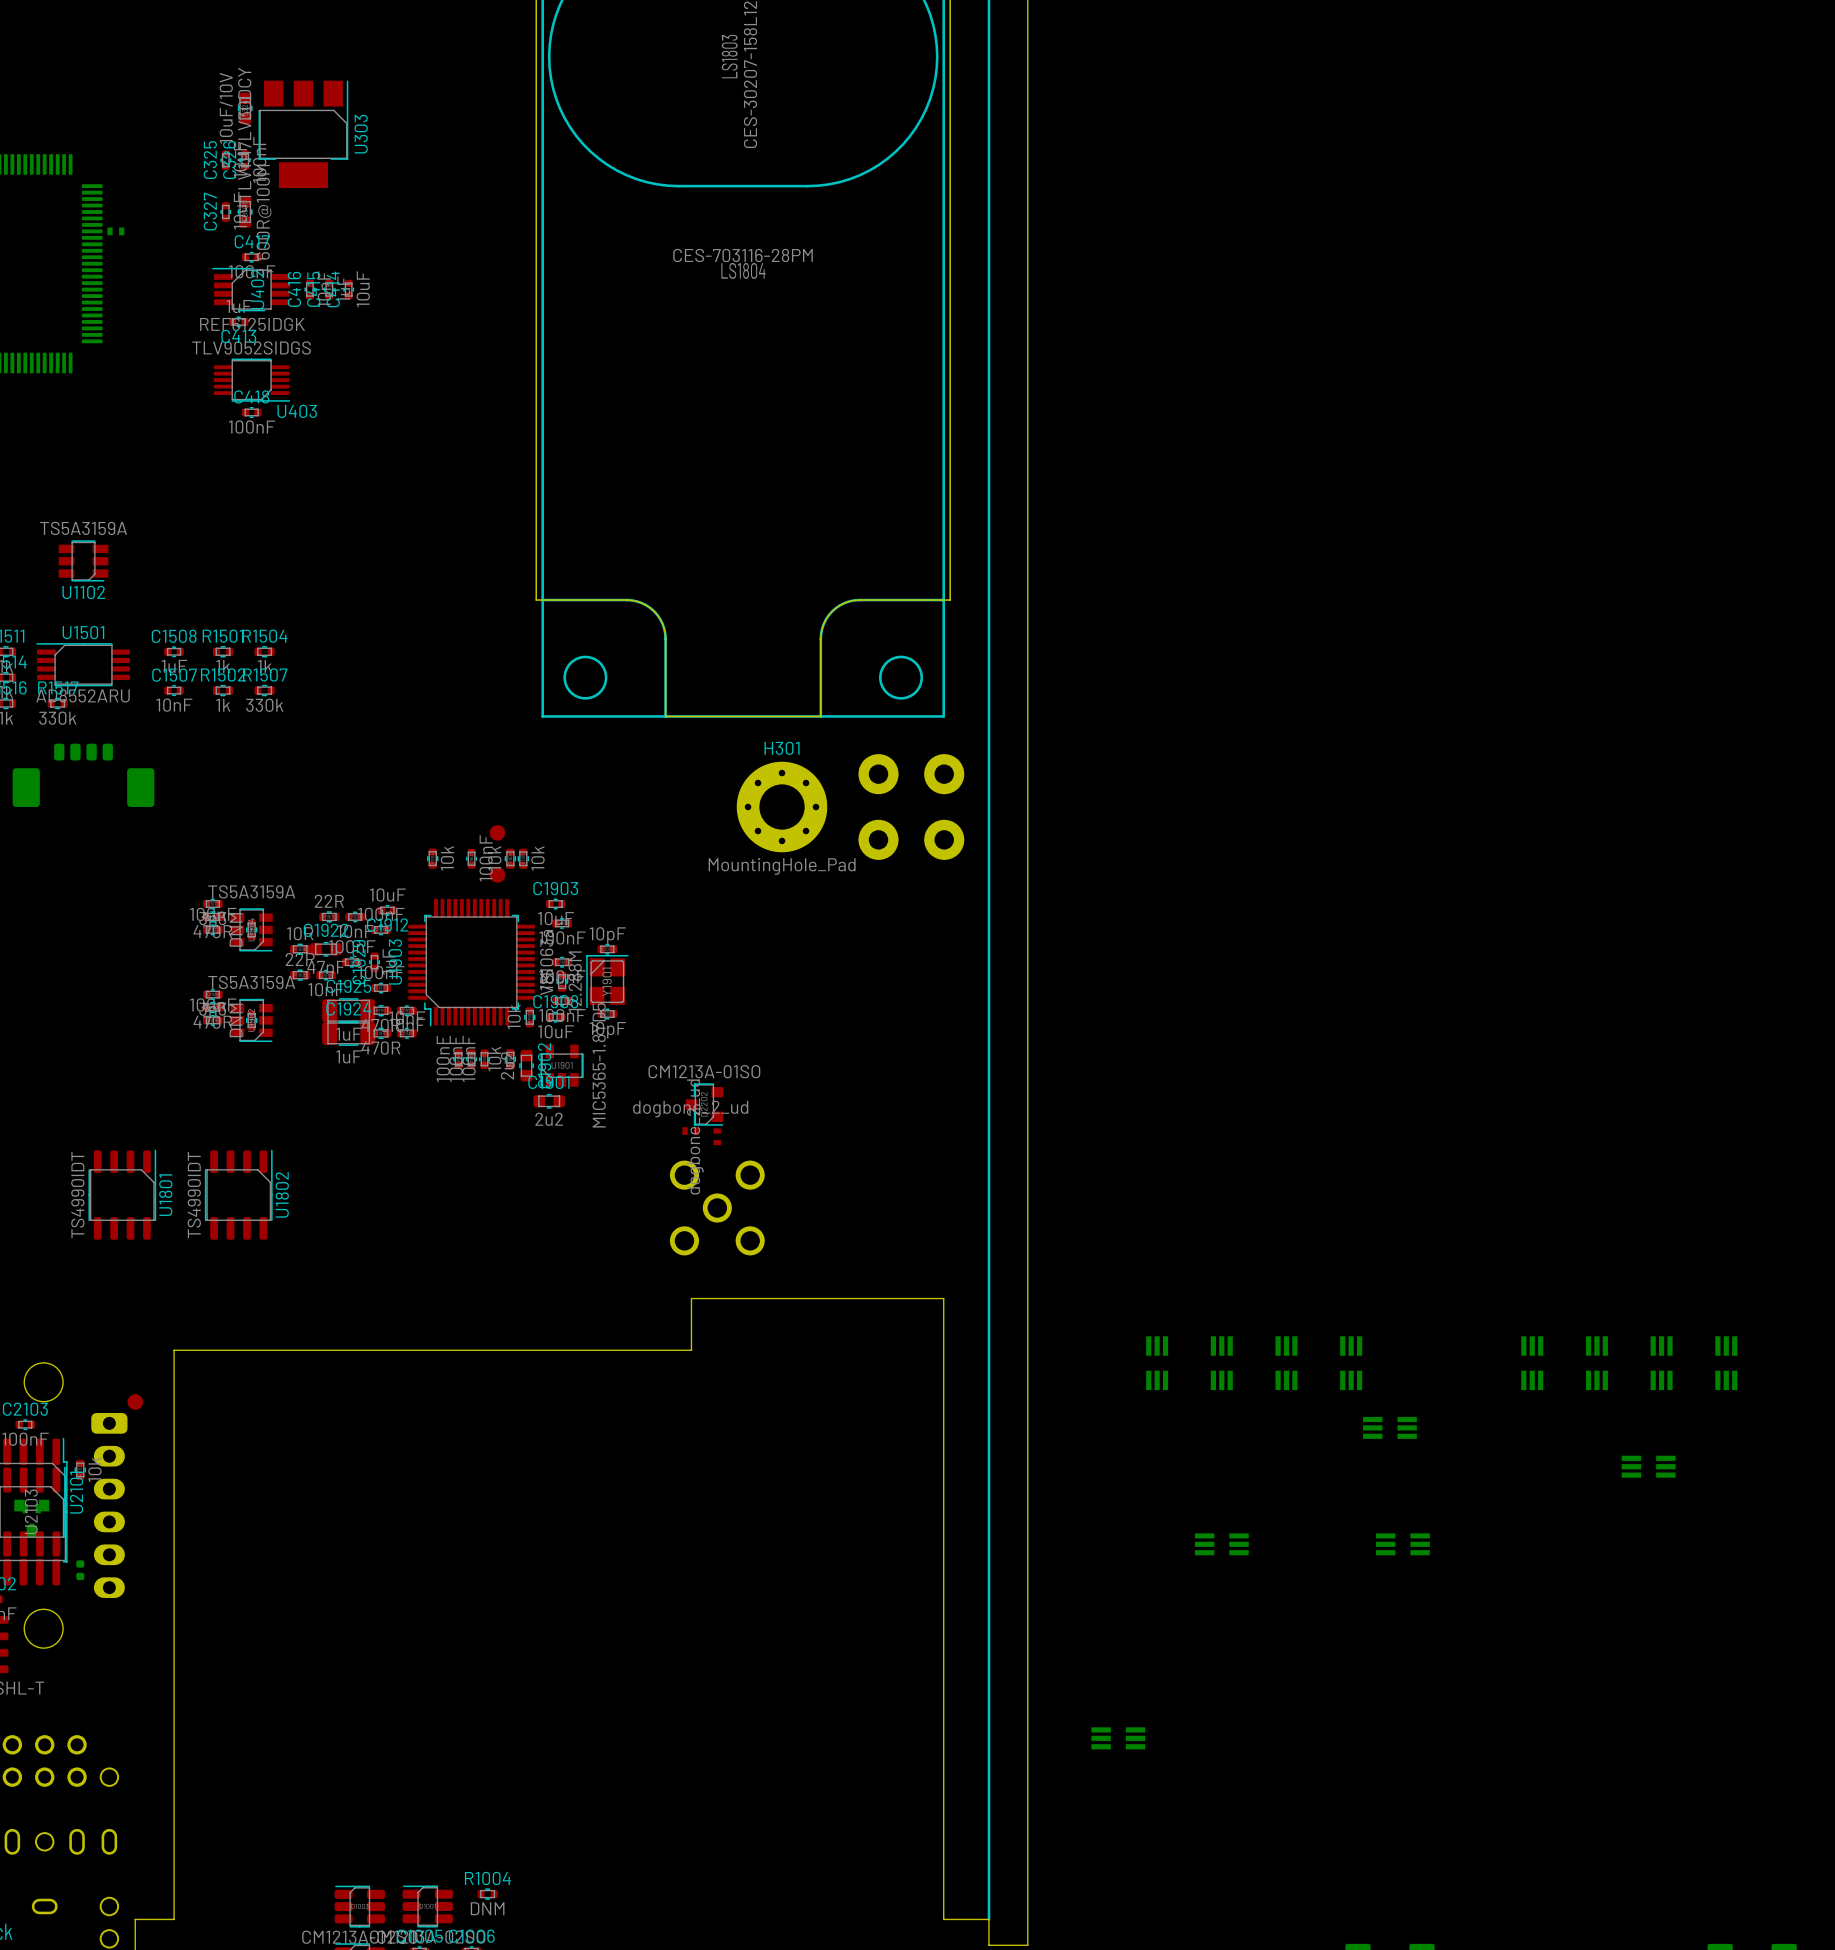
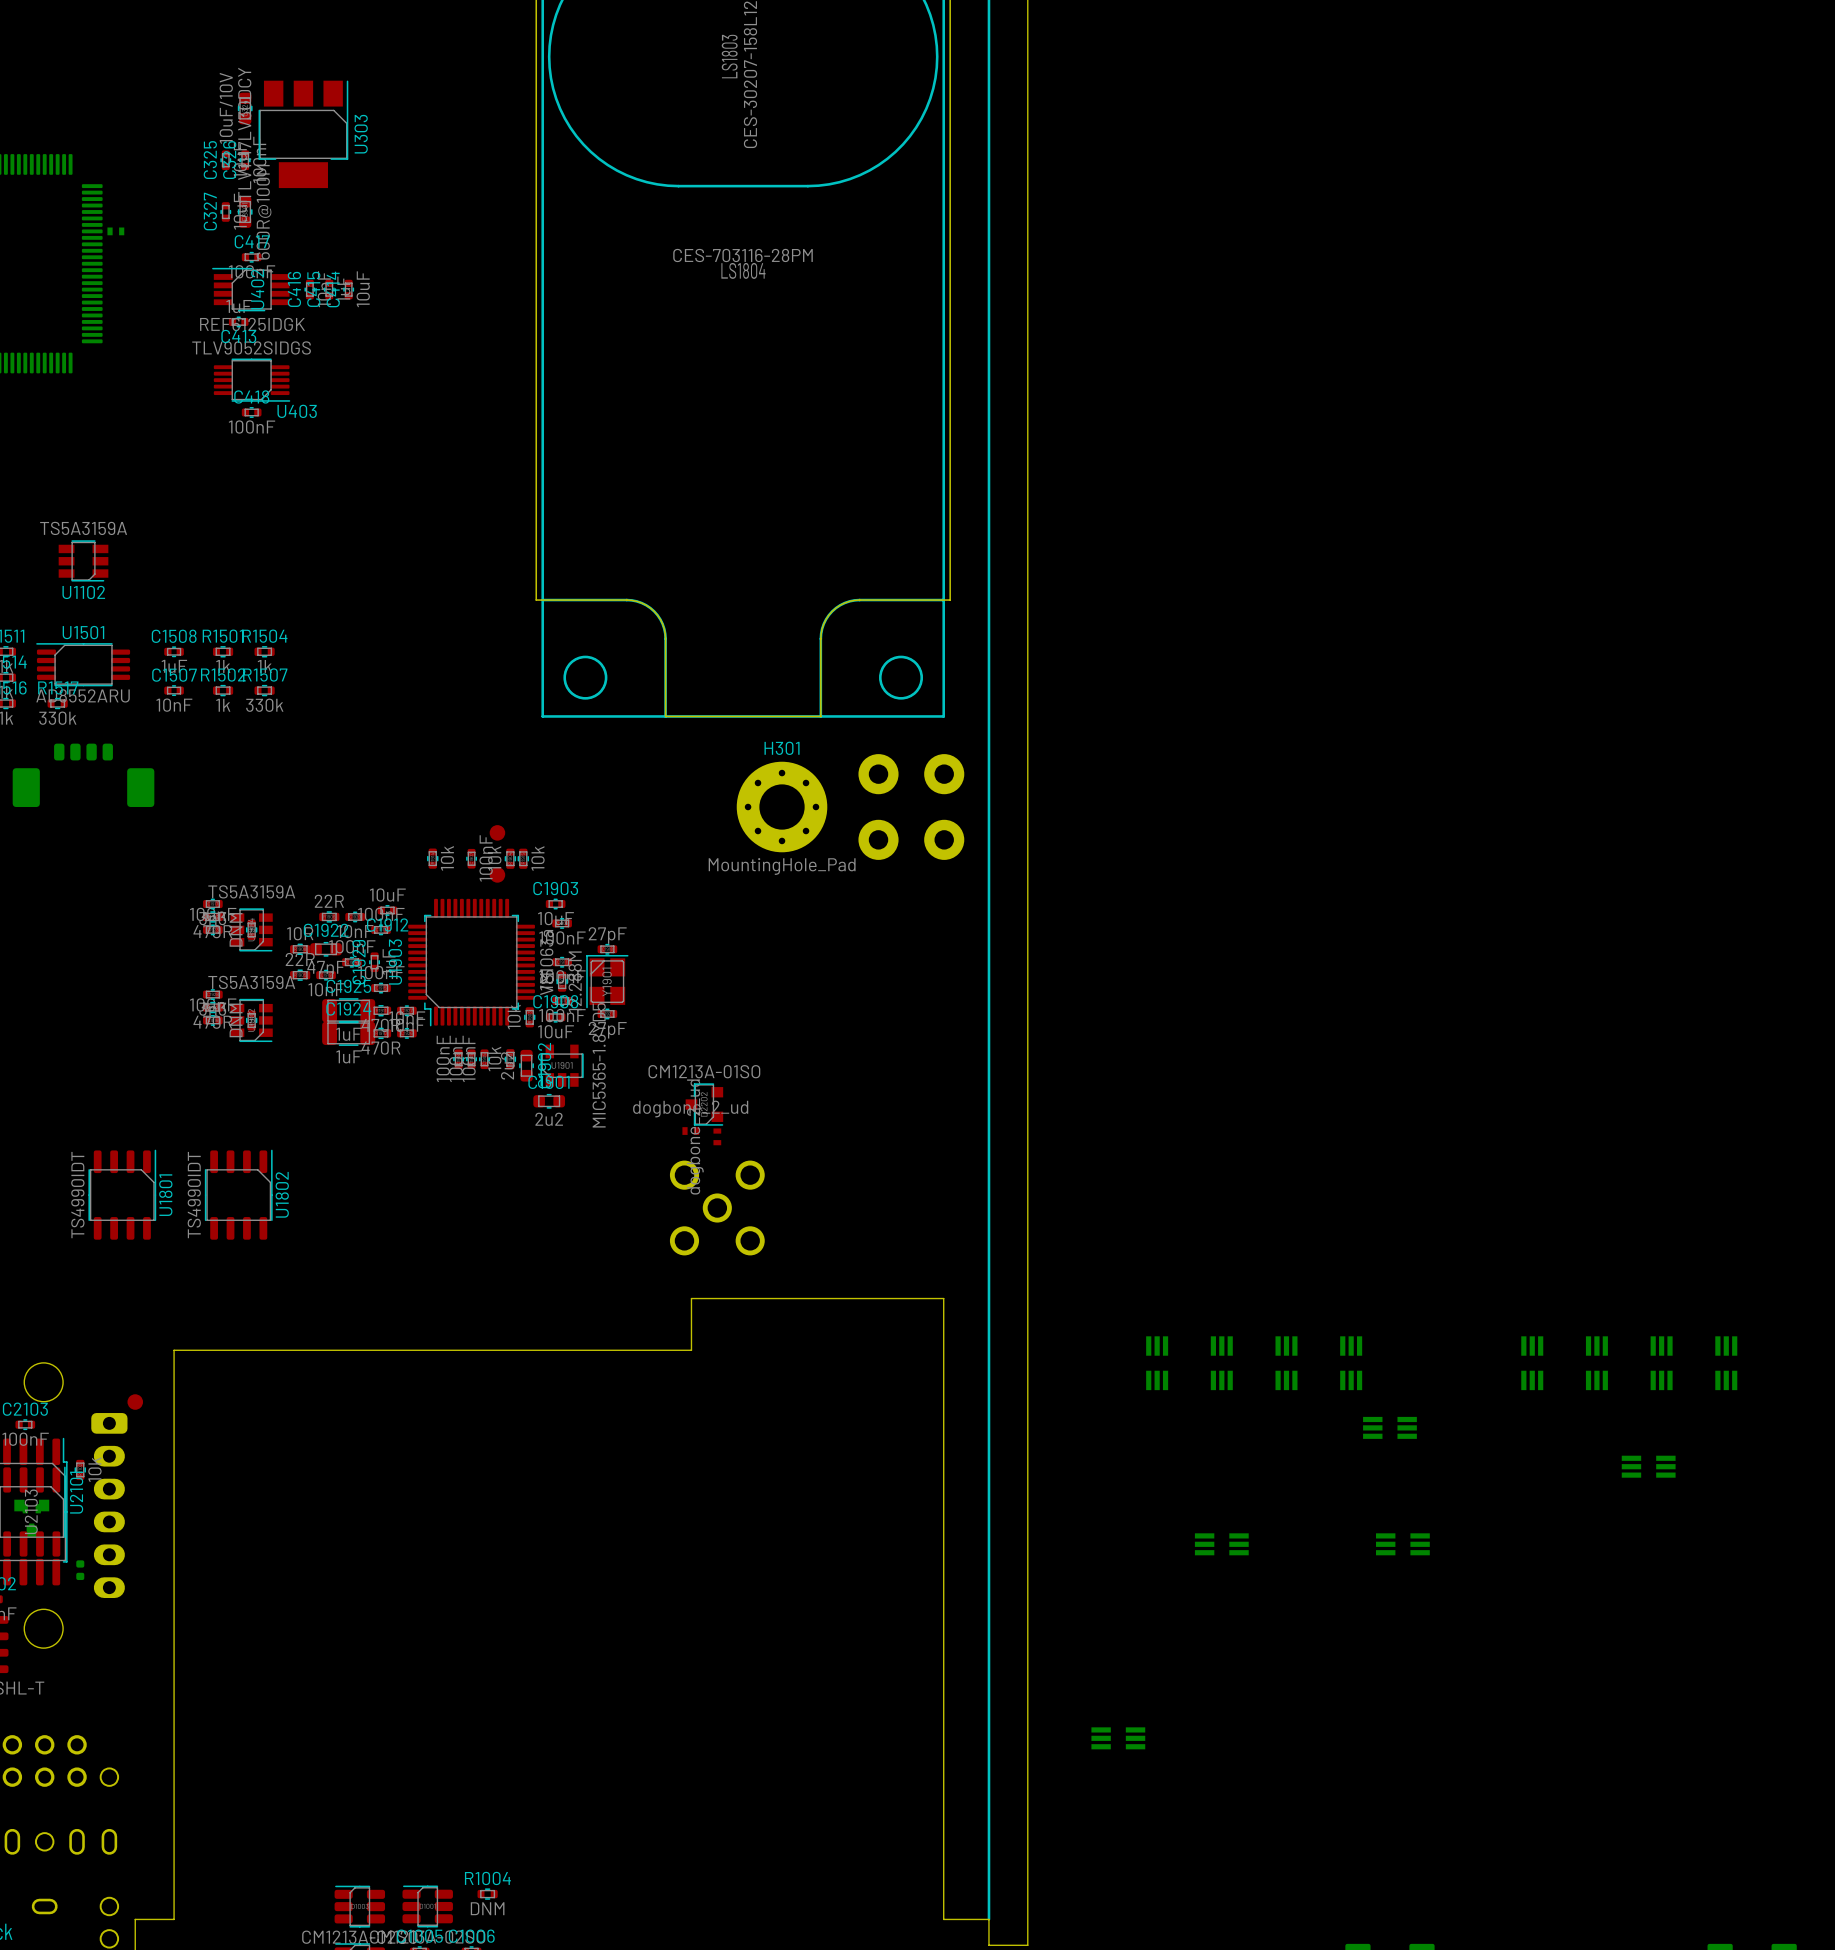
part value: 10pF (607, 935) -> 27pF (607, 935)
part value: 10pF (607, 1030) -> 27pF (607, 1030)

